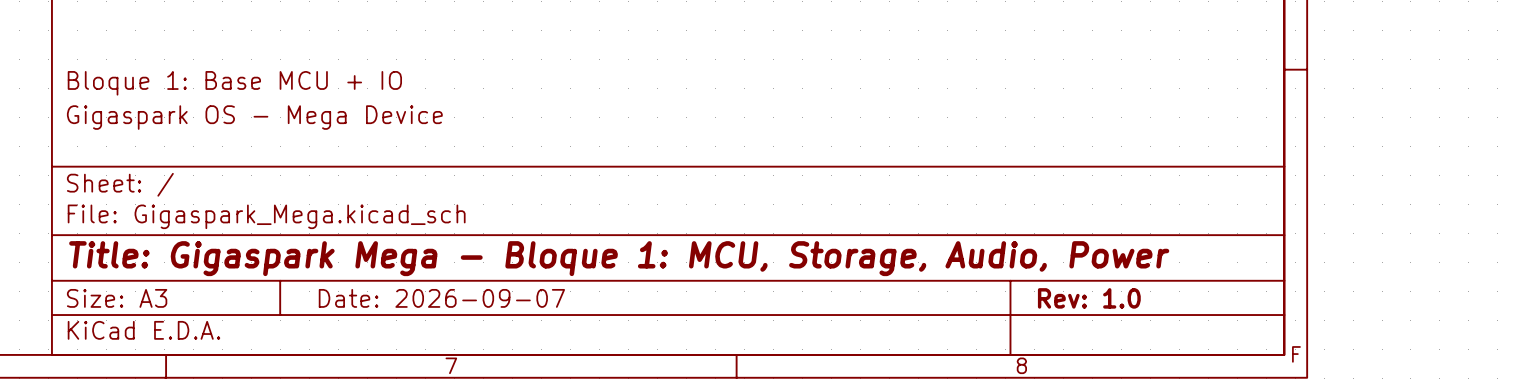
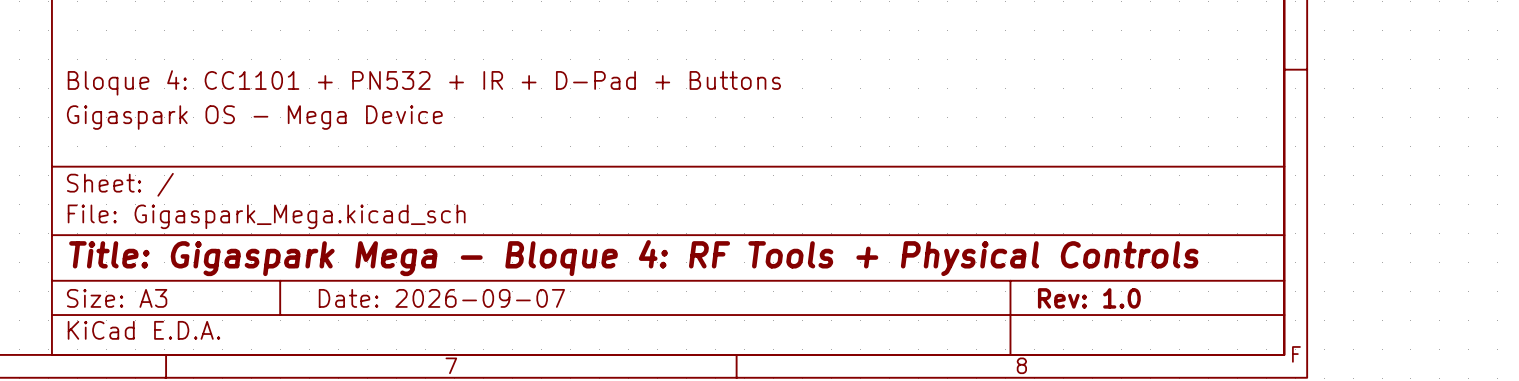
title block: Bloque 1: Base MCU + IO (234, 83) -> Bloque 4: CC1101 + PN532 + IR + D-Pad + Buttons (424, 82)
title block: Title: Gigaspark Mega - Bloque 1: MCU, Storage, Audio, Power (619, 258) -> Title: Gigaspark Mega - Bloque 4: RF Tools + Physical Controls (633, 258)

